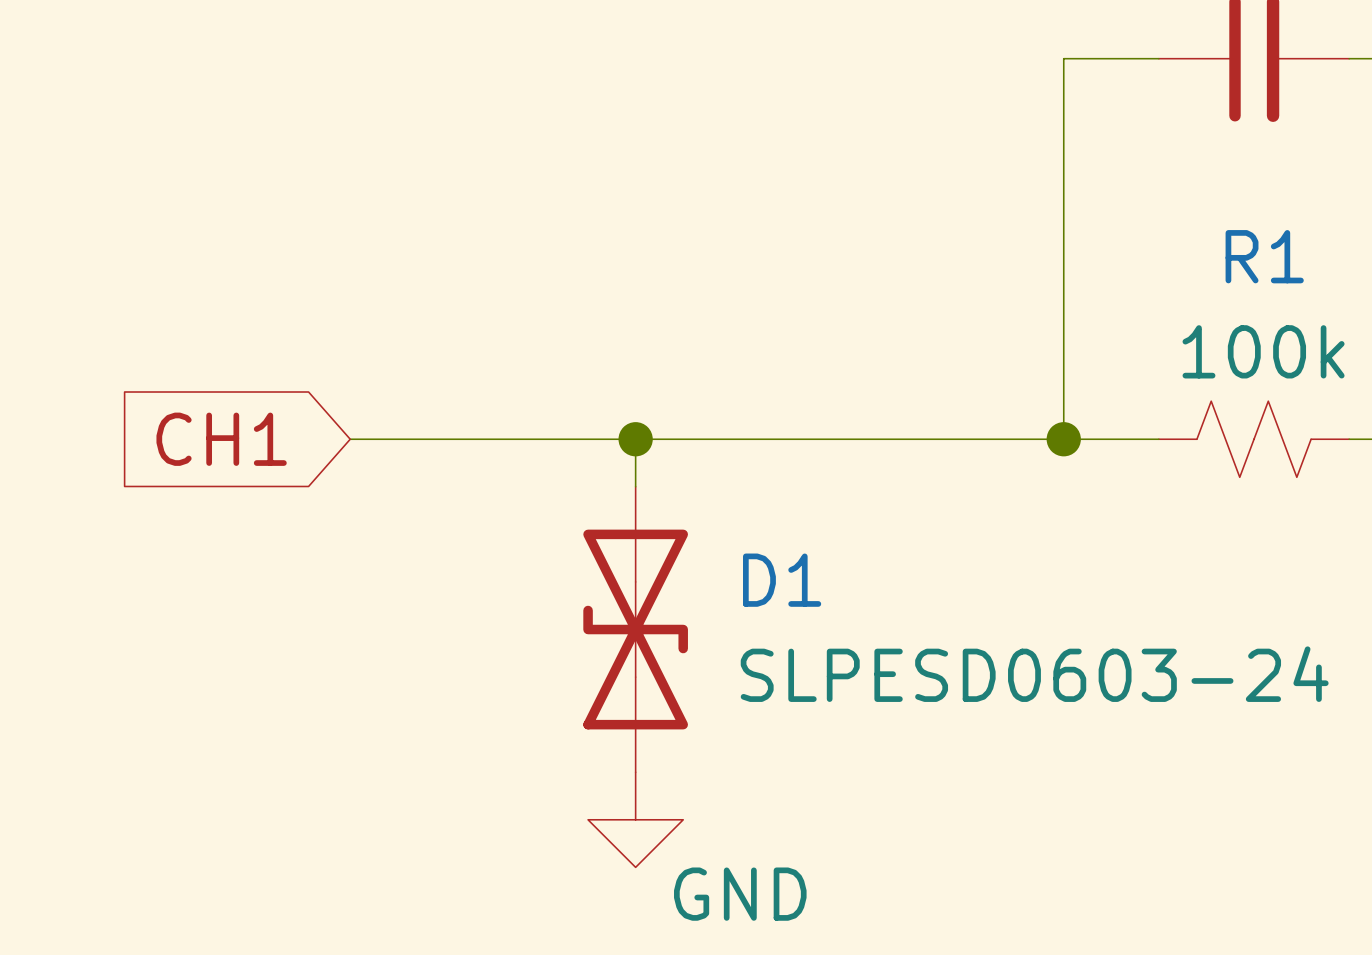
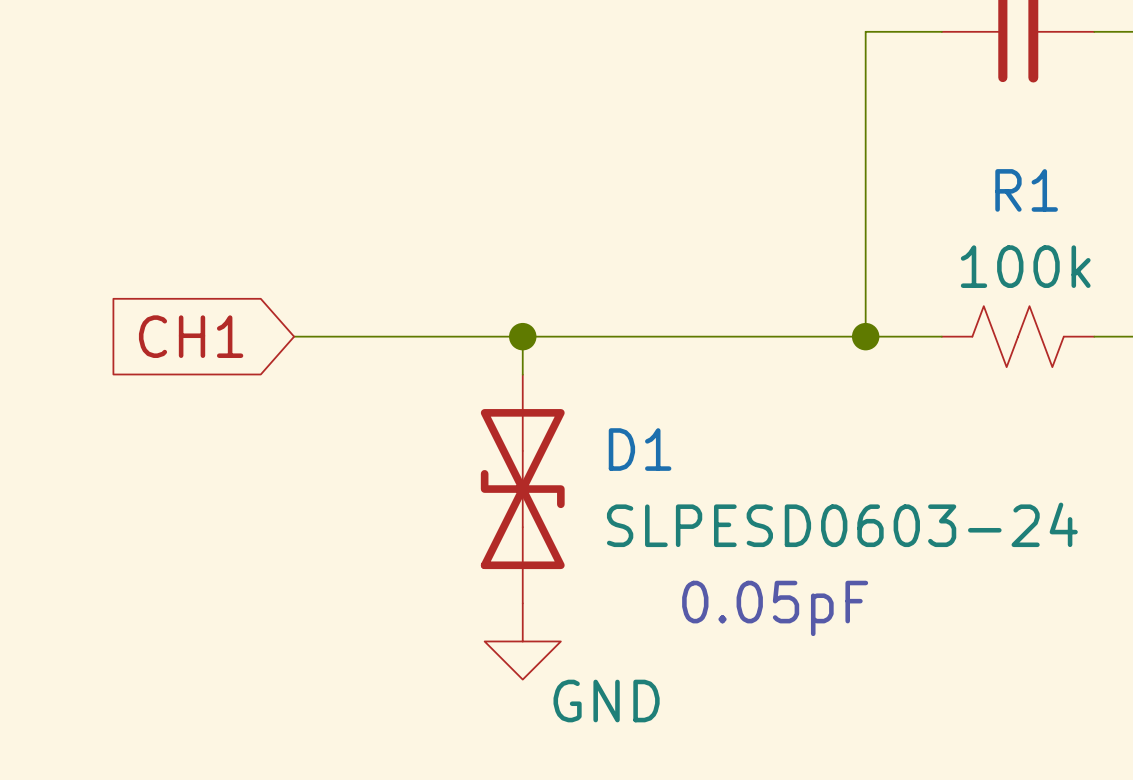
text: none -> 0.05pF (775, 608)

